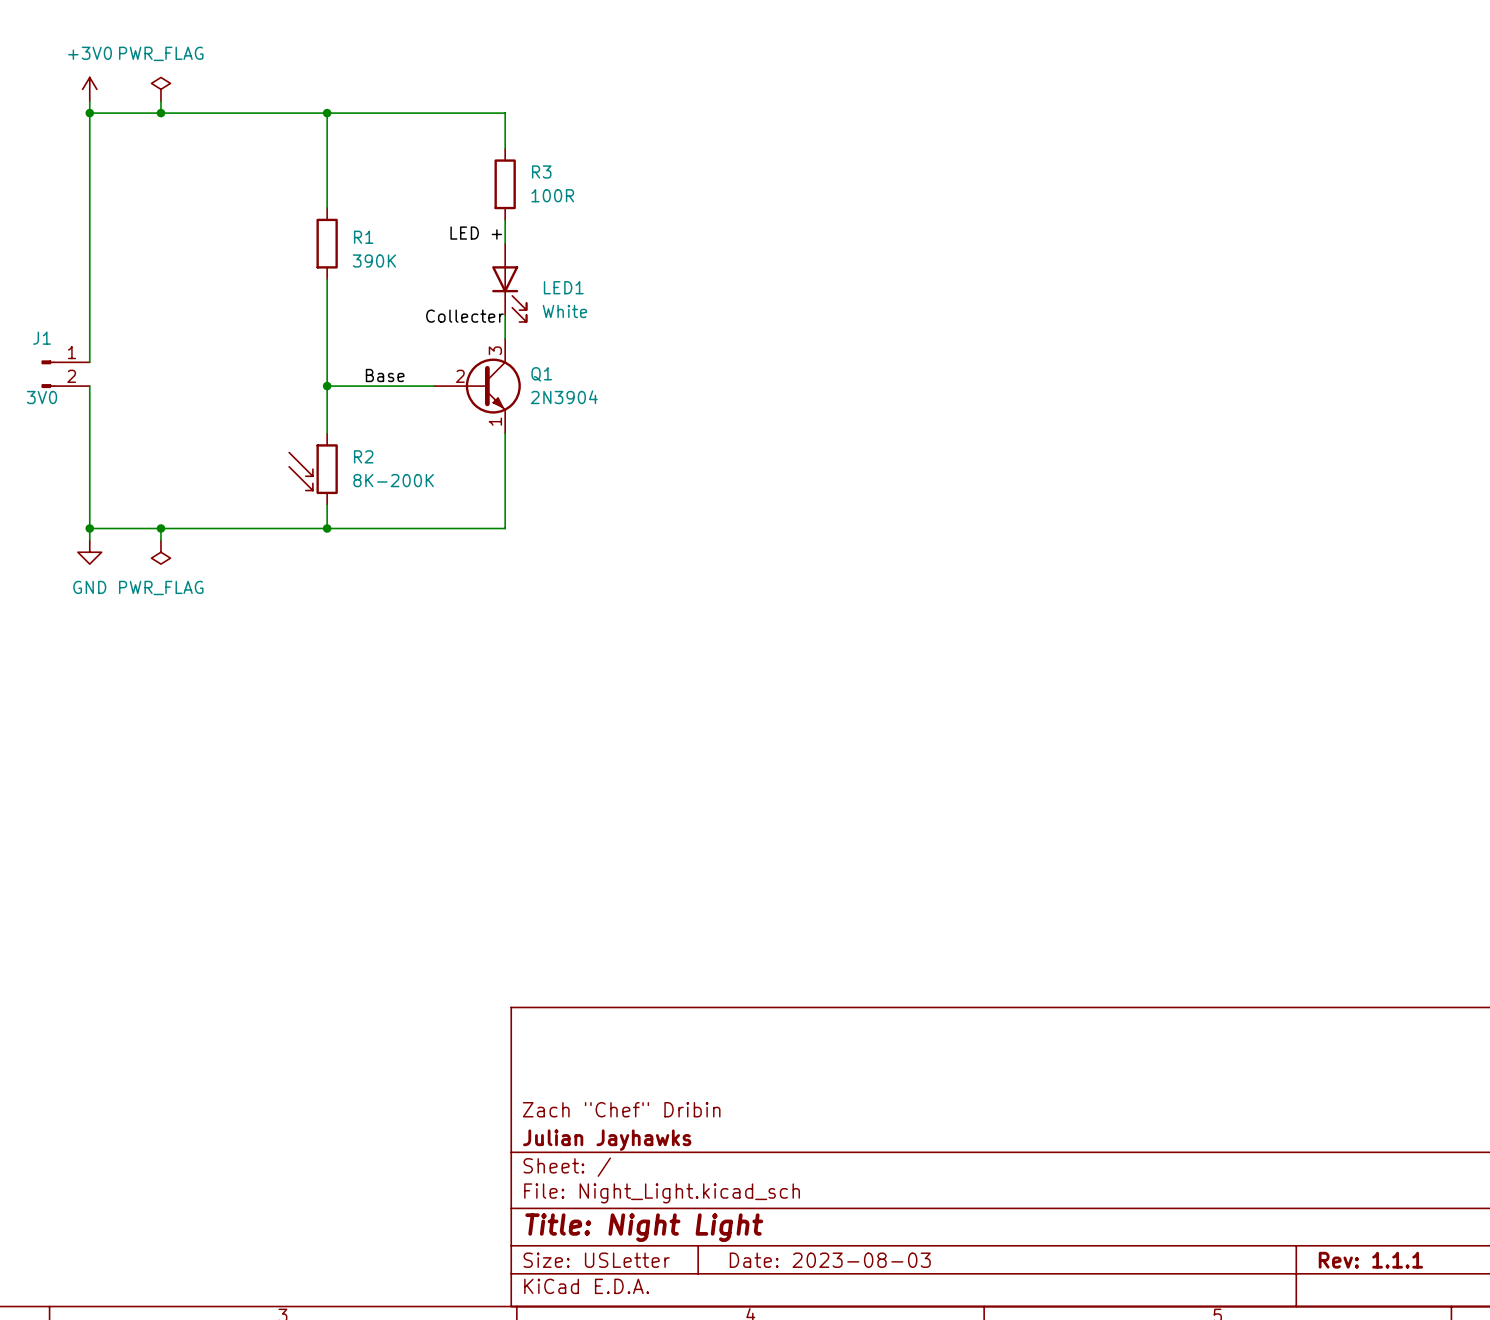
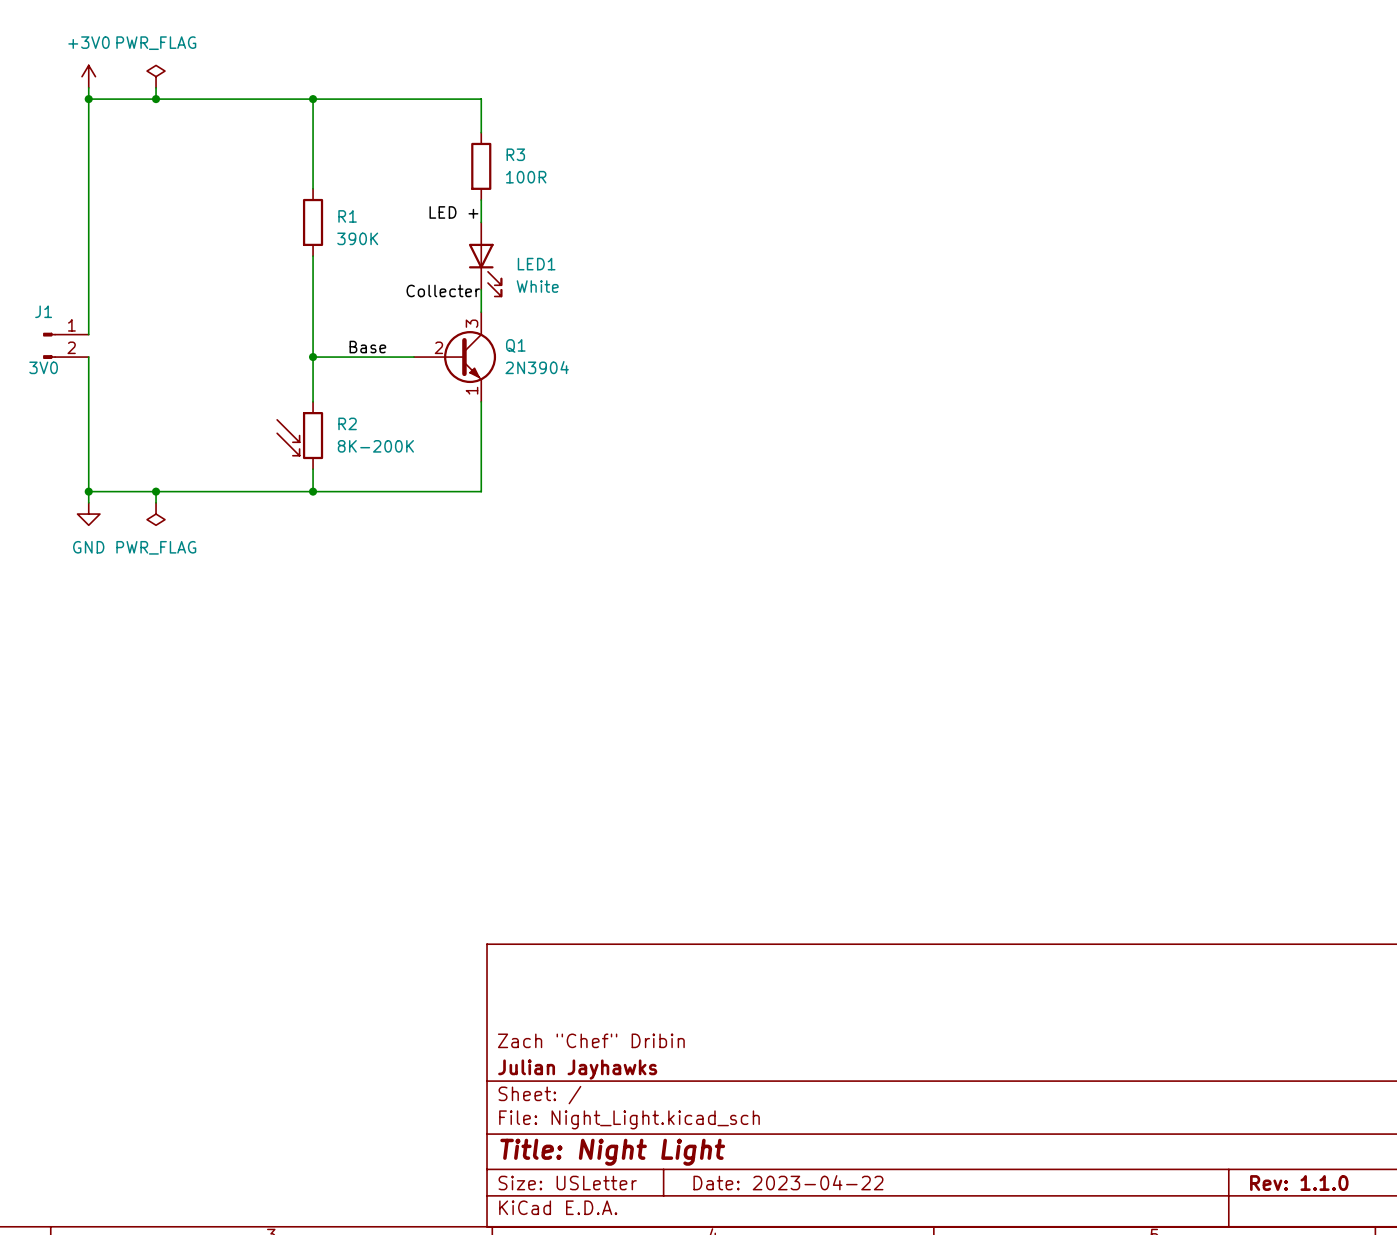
title block: Date: 2023-08-03 (830, 1260) -> Date: 2023-04-22 (788, 1182)
title block: Rev: 1.1.1 (1370, 1260) -> Rev: 1.1.0 (1299, 1183)

